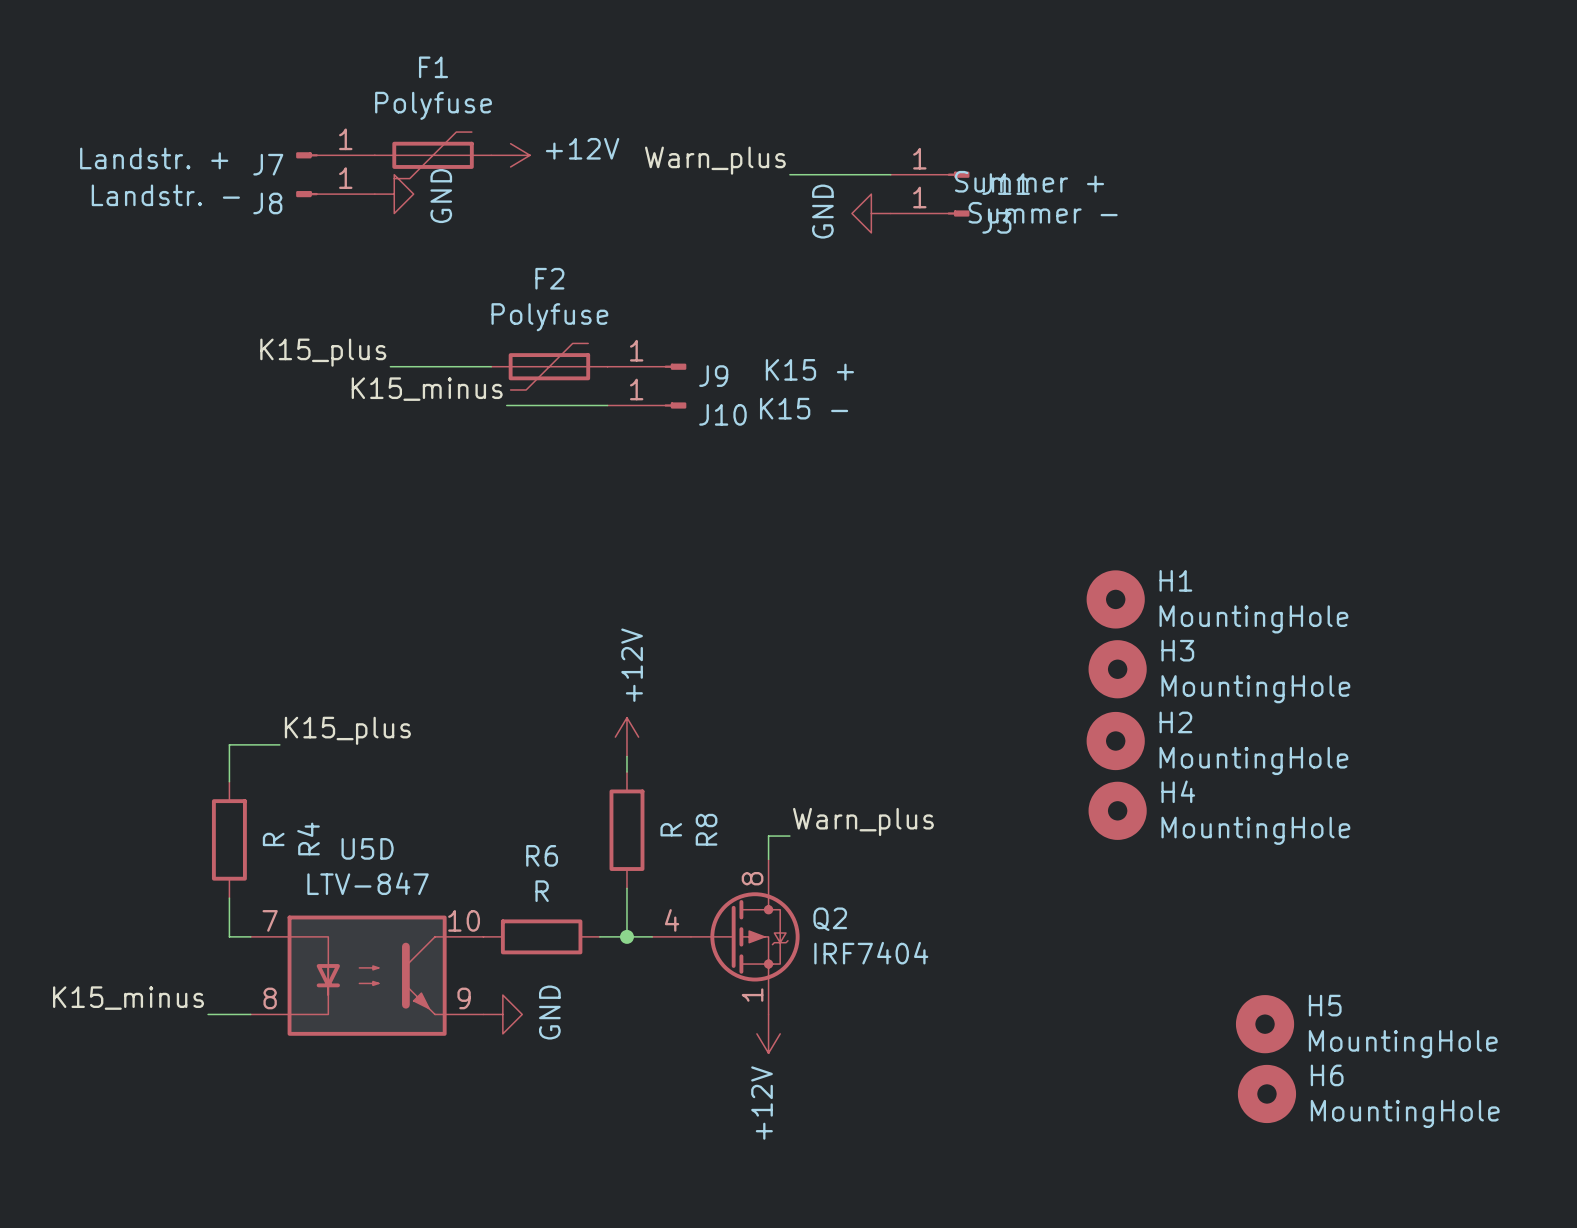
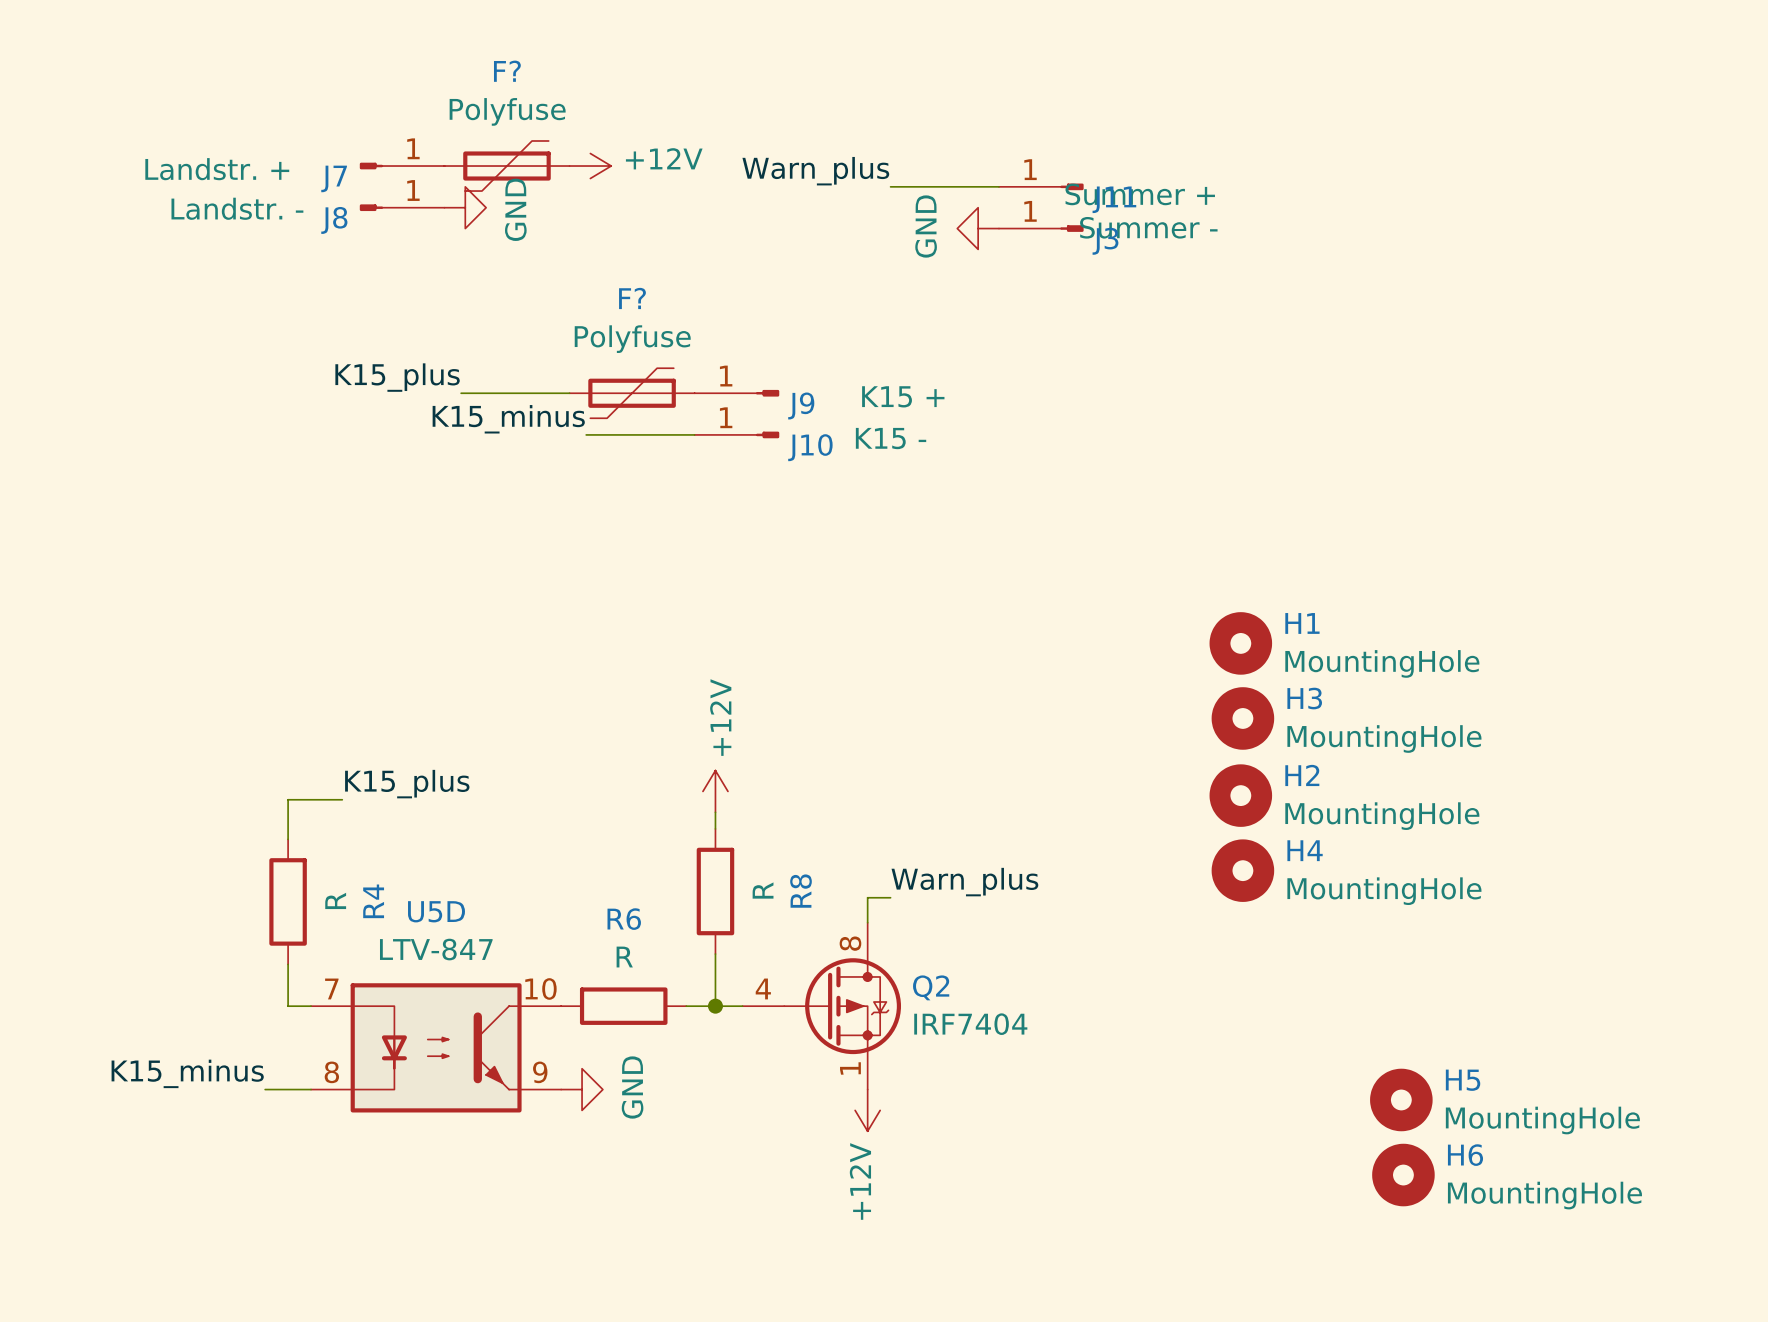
F1 name: F1 (433, 67) -> F? (507, 71)
F2 name: F2 (549, 278) -> F? (632, 298)

